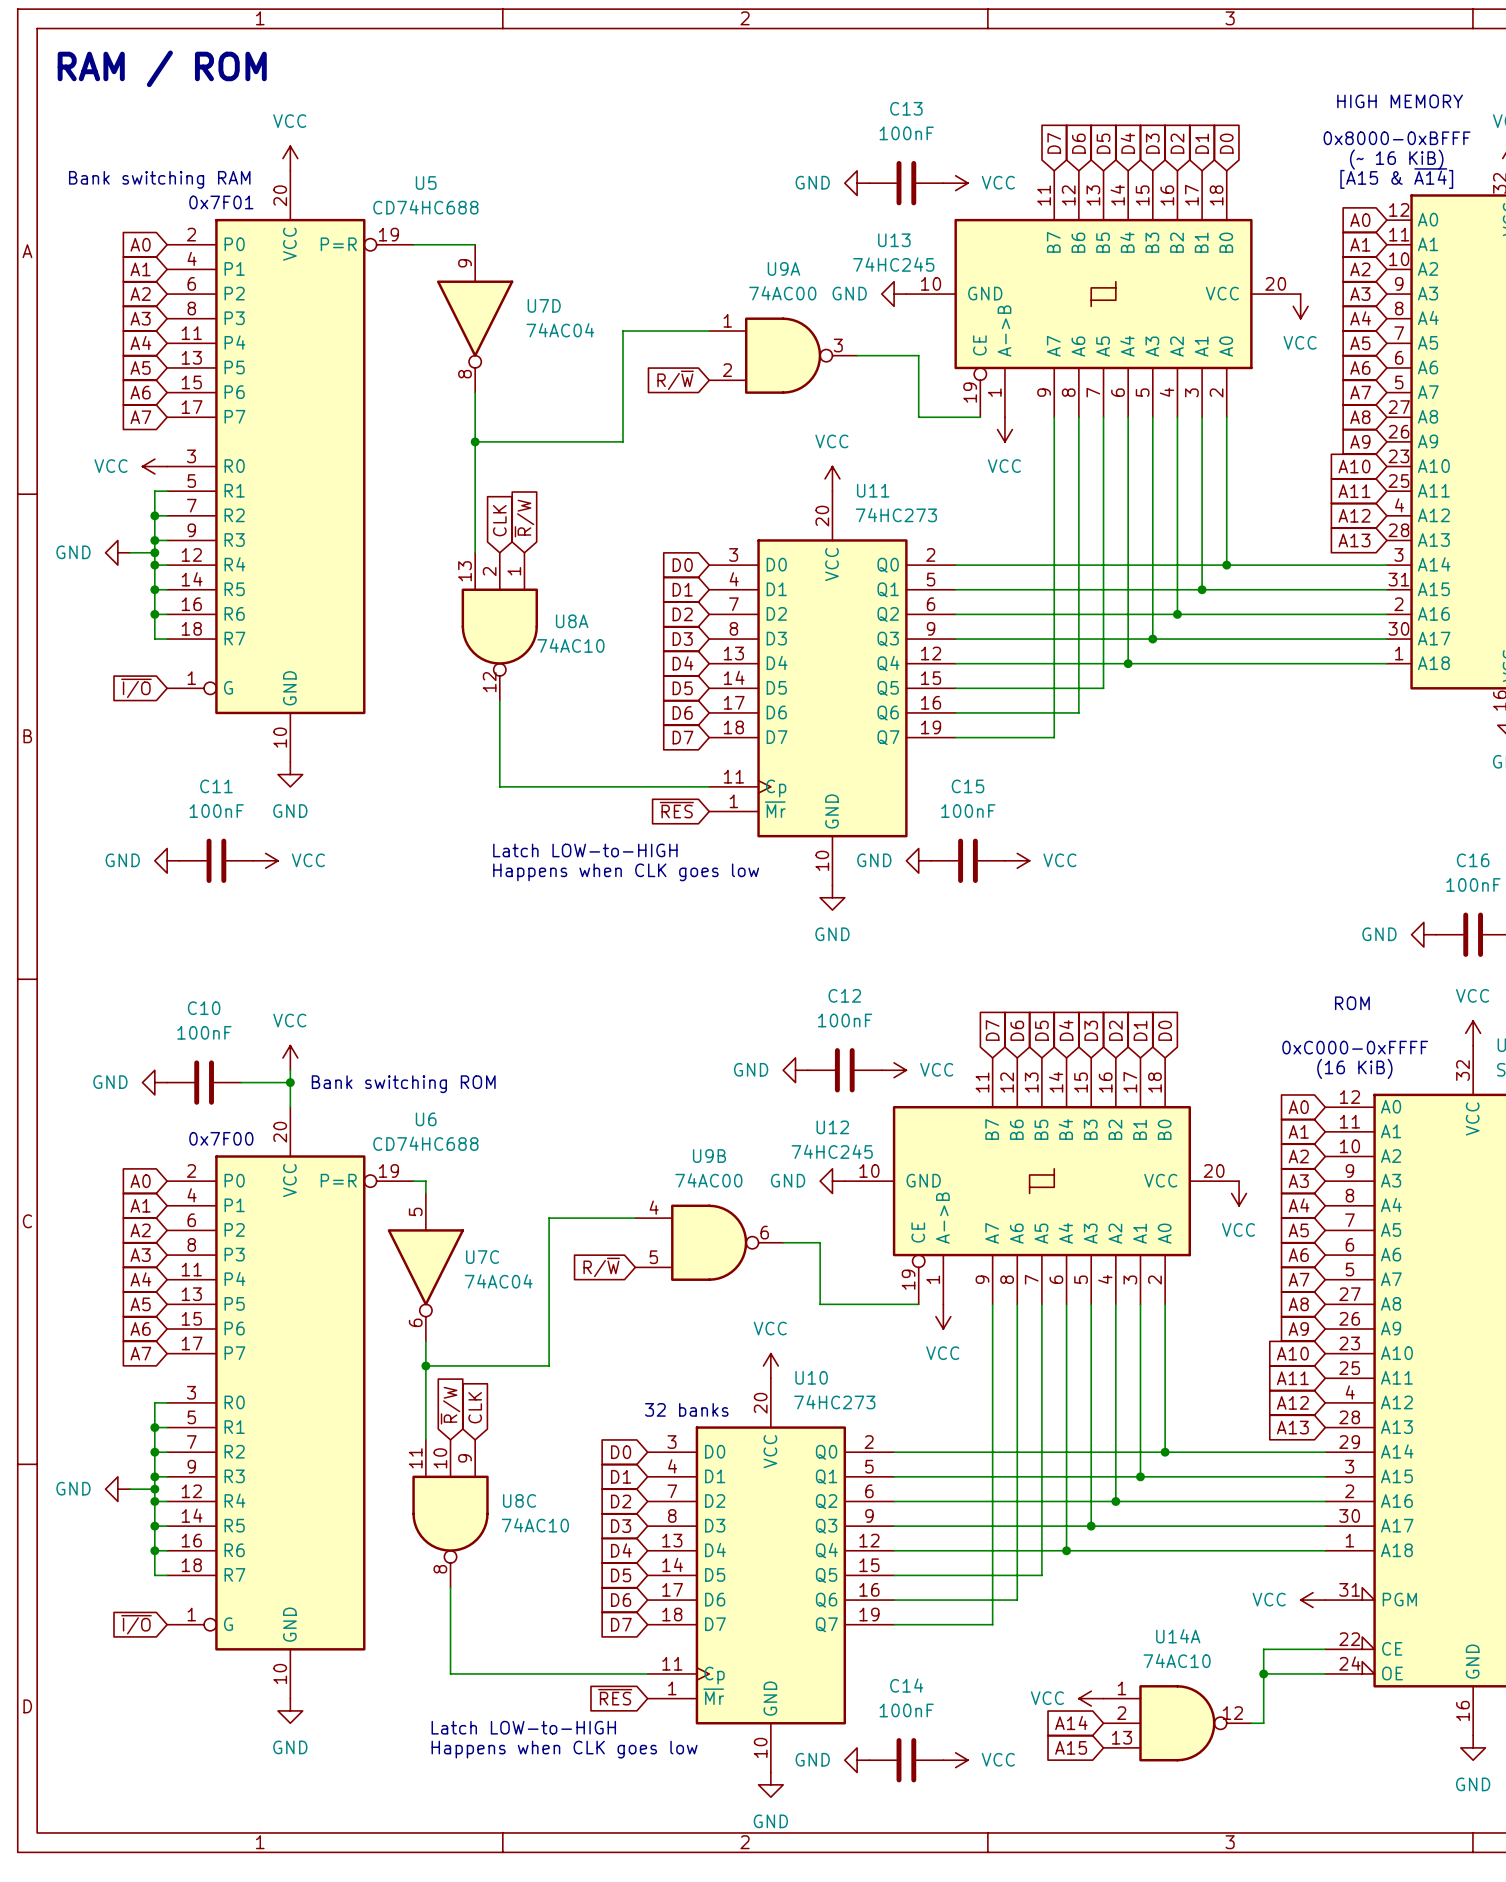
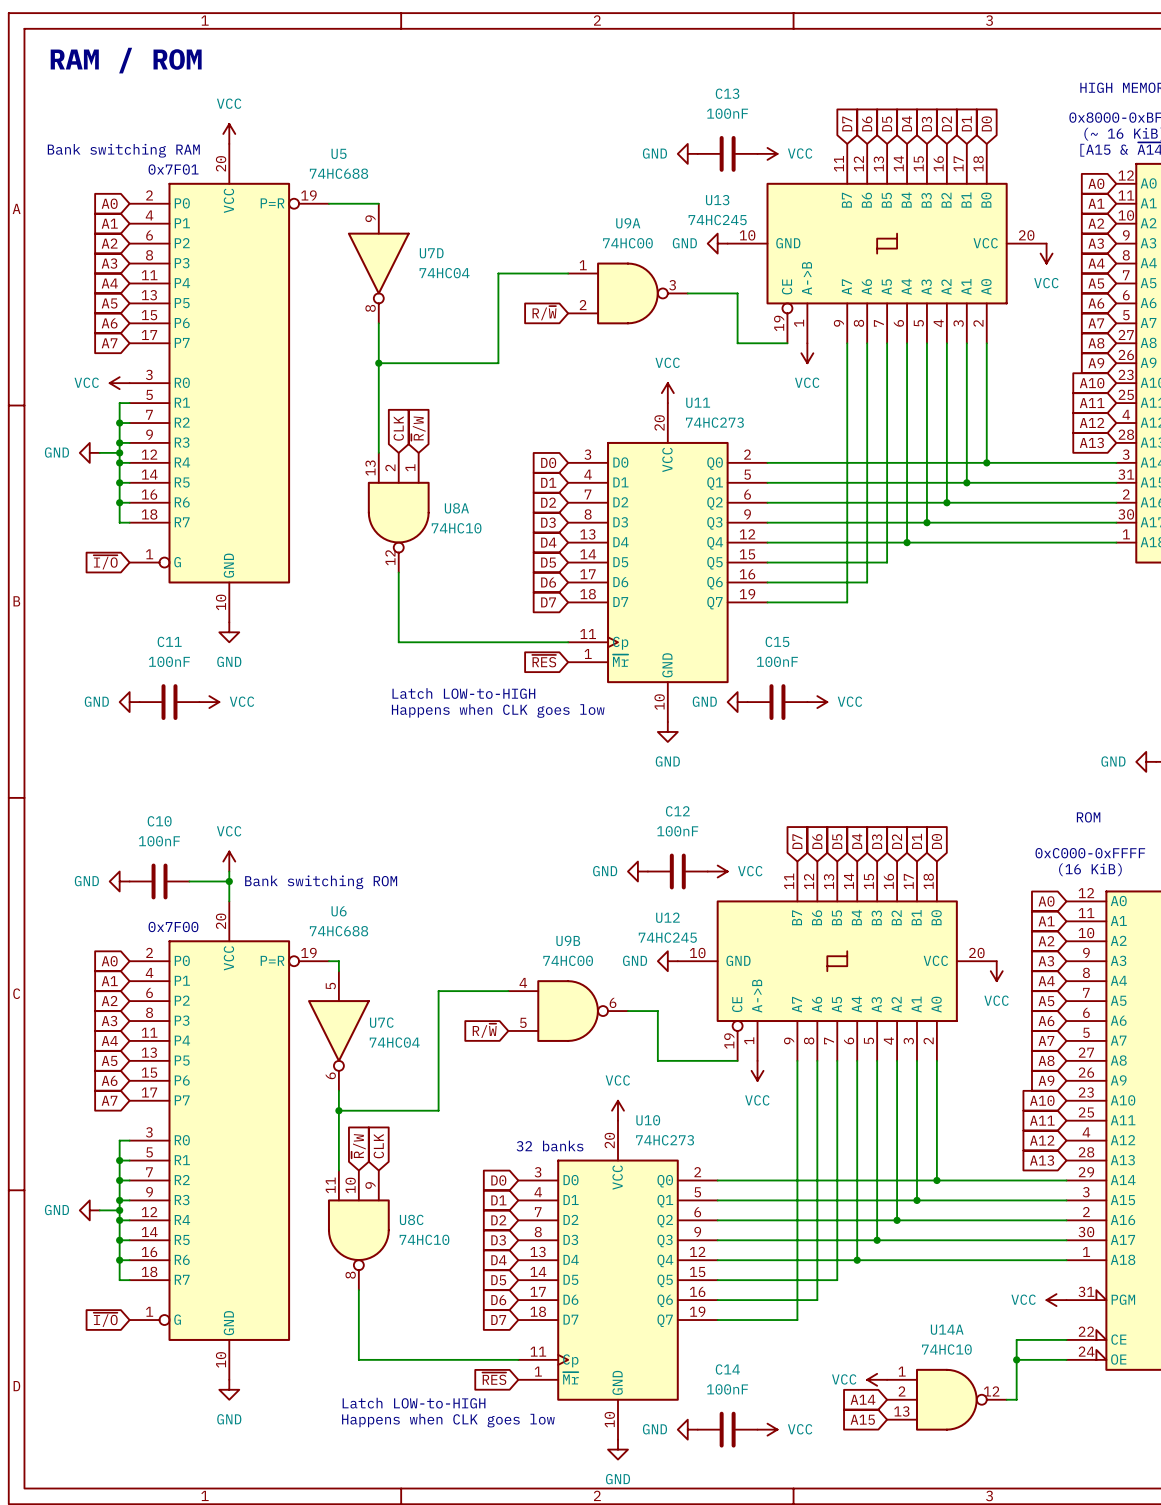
U5 value: CD74HC688 (425, 207) -> 74HC688 (339, 173)
U9A value: 74AC00 (782, 293) -> 74HC00 (627, 243)
U7D value: 74AC04 (560, 330) -> 74HC04 (444, 273)
U8A value: 74AC10 (570, 645) -> 74HC10 (456, 528)
U6 value: CD74HC688 (425, 1143) -> 74HC688 (339, 931)
U9B value: 74AC00 (708, 1180) -> 74HC00 (568, 960)
U7C value: 74AC04 (498, 1281) -> 74HC04 (394, 1042)
U8C value: 74AC10 (535, 1525) -> 74HC10 (424, 1239)
U14A value: 74AC10 (1177, 1660) -> 74HC10 (946, 1349)

